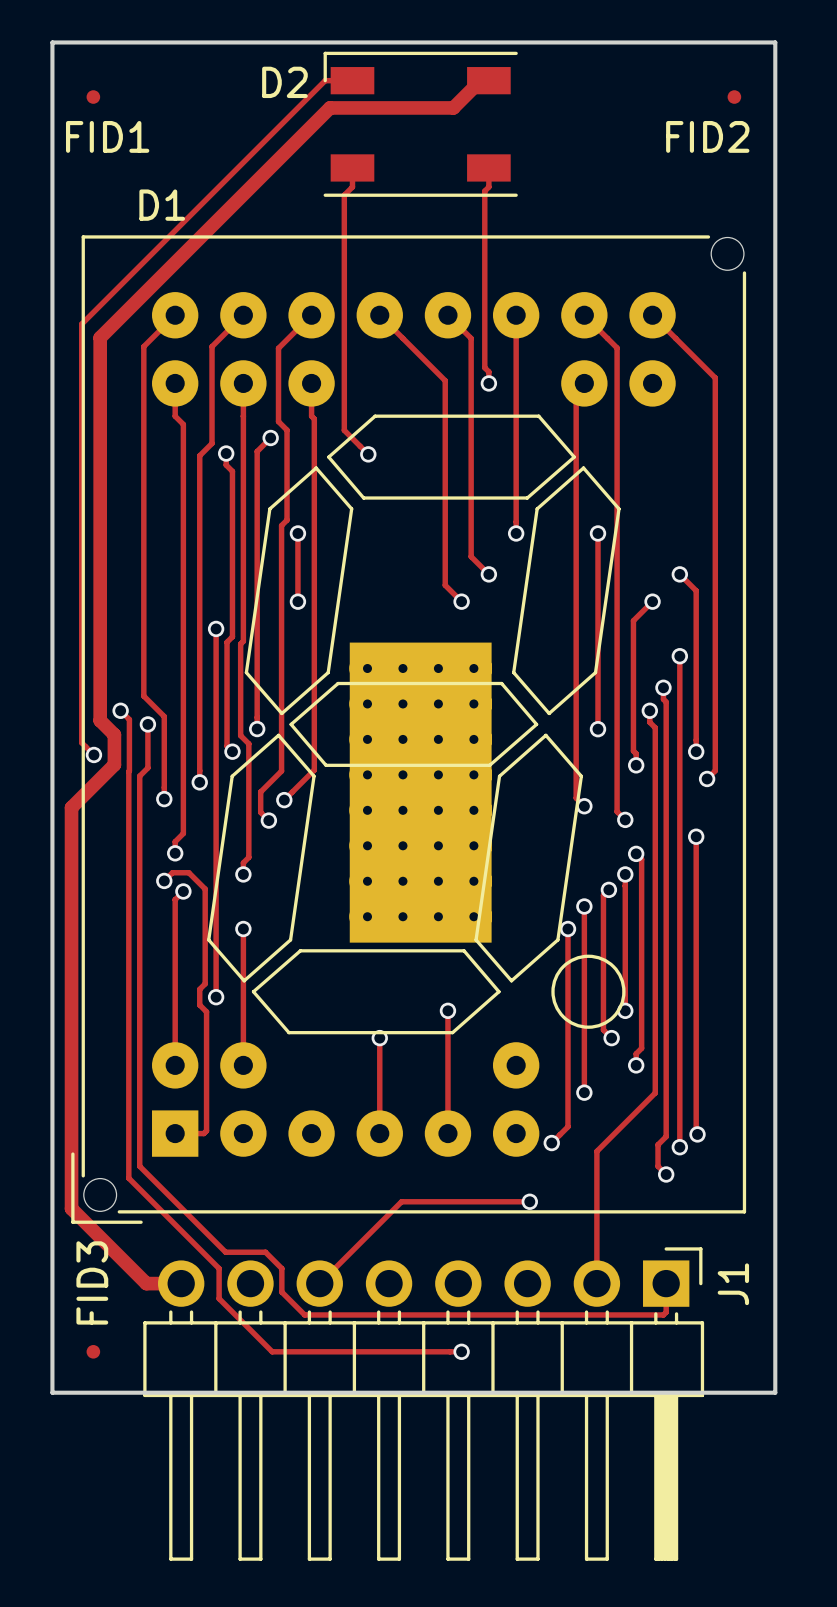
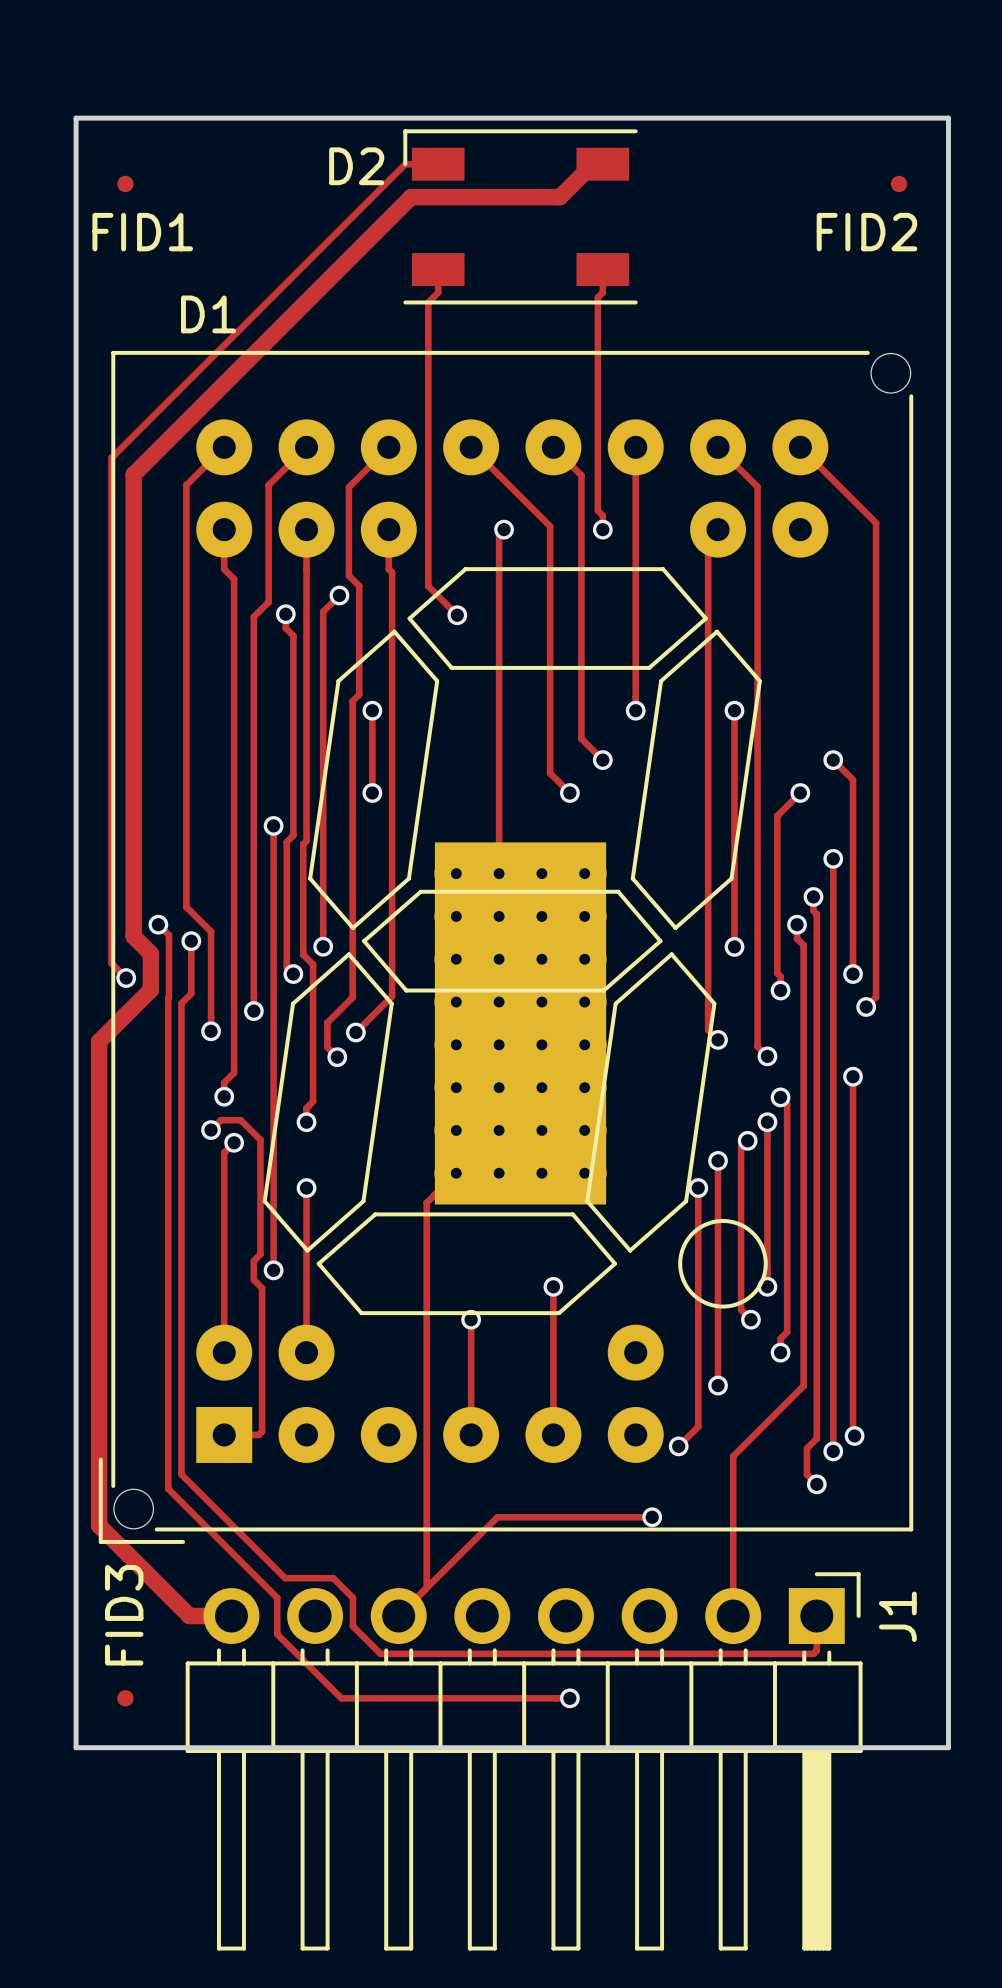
track: none -> (504, 529) (499, 534) (499, 873)
via: none -> (504, 529)
track: none -> (456, 1173) (426, 1202) (426, 1588)

